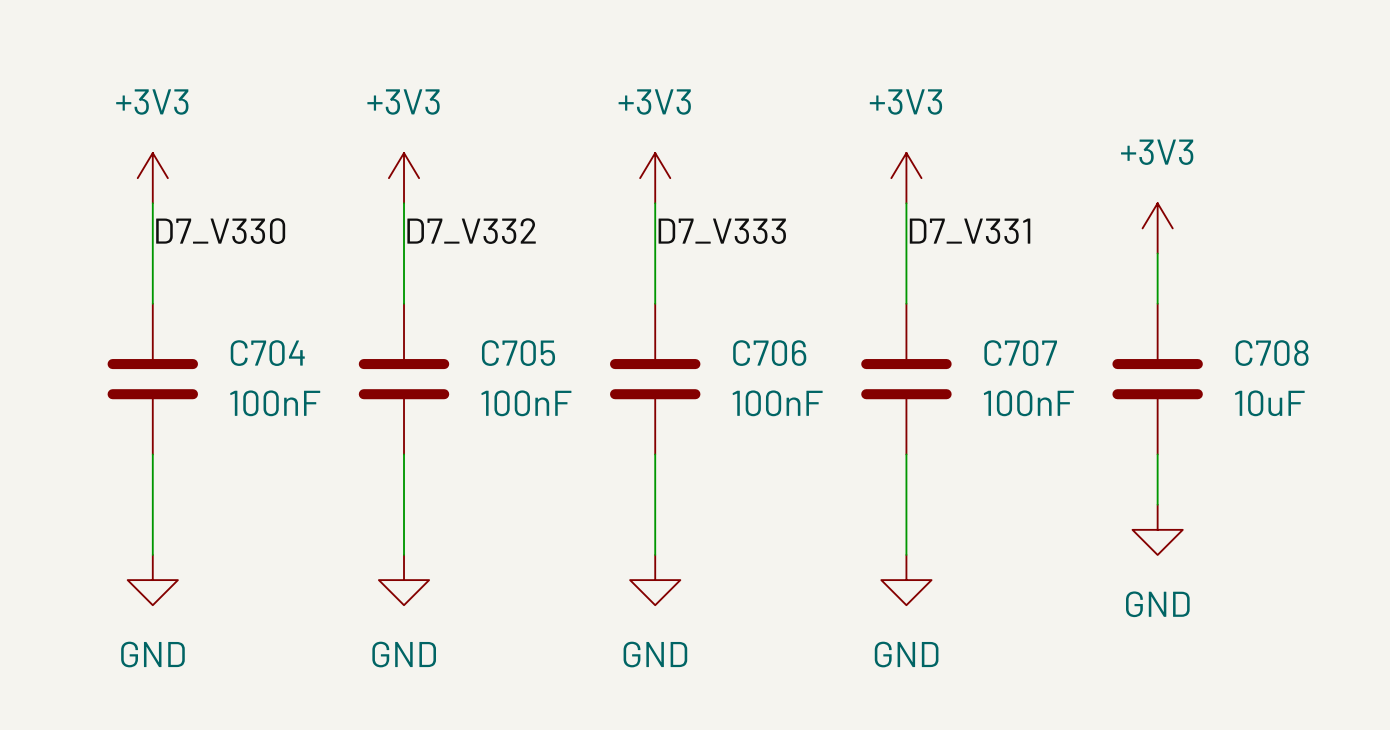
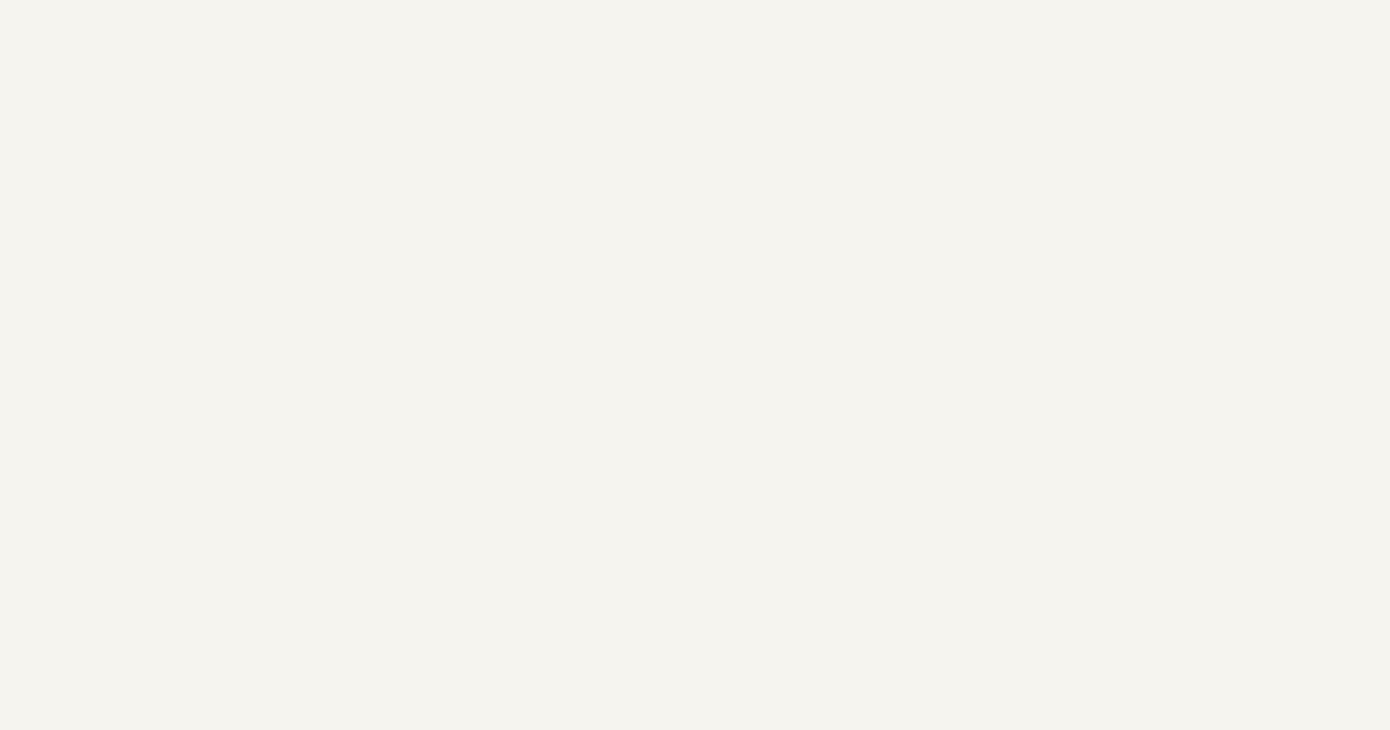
power symbol: +3V3 (152, 178) -> none
power symbol: +3V3 (404, 178) -> none
power symbol: +3V3 (655, 178) -> none
power symbol: +3V3 (906, 178) -> none
wire: (152, 203) (152, 303) -> none
wire: (404, 203) (404, 303) -> none
wire: (655, 203) (655, 303) -> none
wire: (906, 203) (906, 303) -> none
power symbol: +3V3 (1157, 228) -> none
label: D7_V330 (220, 231) -> none
label: D7_V332 (471, 231) -> none
label: D7_V333 (722, 231) -> none
label: D7_V331 (970, 231) -> none
wire: (1157, 253) (1157, 303) -> none
C704: 100nF (152, 379) -> none
C705: 100nF (404, 379) -> none
C706: 100nF (655, 379) -> none
C707: 100nF (906, 379) -> none
C708: 10uF (1157, 379) -> none
wire: (152, 454) (152, 554) -> none
wire: (404, 454) (404, 554) -> none
wire: (655, 454) (655, 554) -> none
wire: (906, 454) (906, 554) -> none
wire: (1157, 454) (1157, 504) -> none
power symbol: GND (1157, 529) -> none
power symbol: GND (152, 580) -> none
power symbol: GND (404, 580) -> none
power symbol: GND (655, 580) -> none
power symbol: GND (906, 580) -> none

